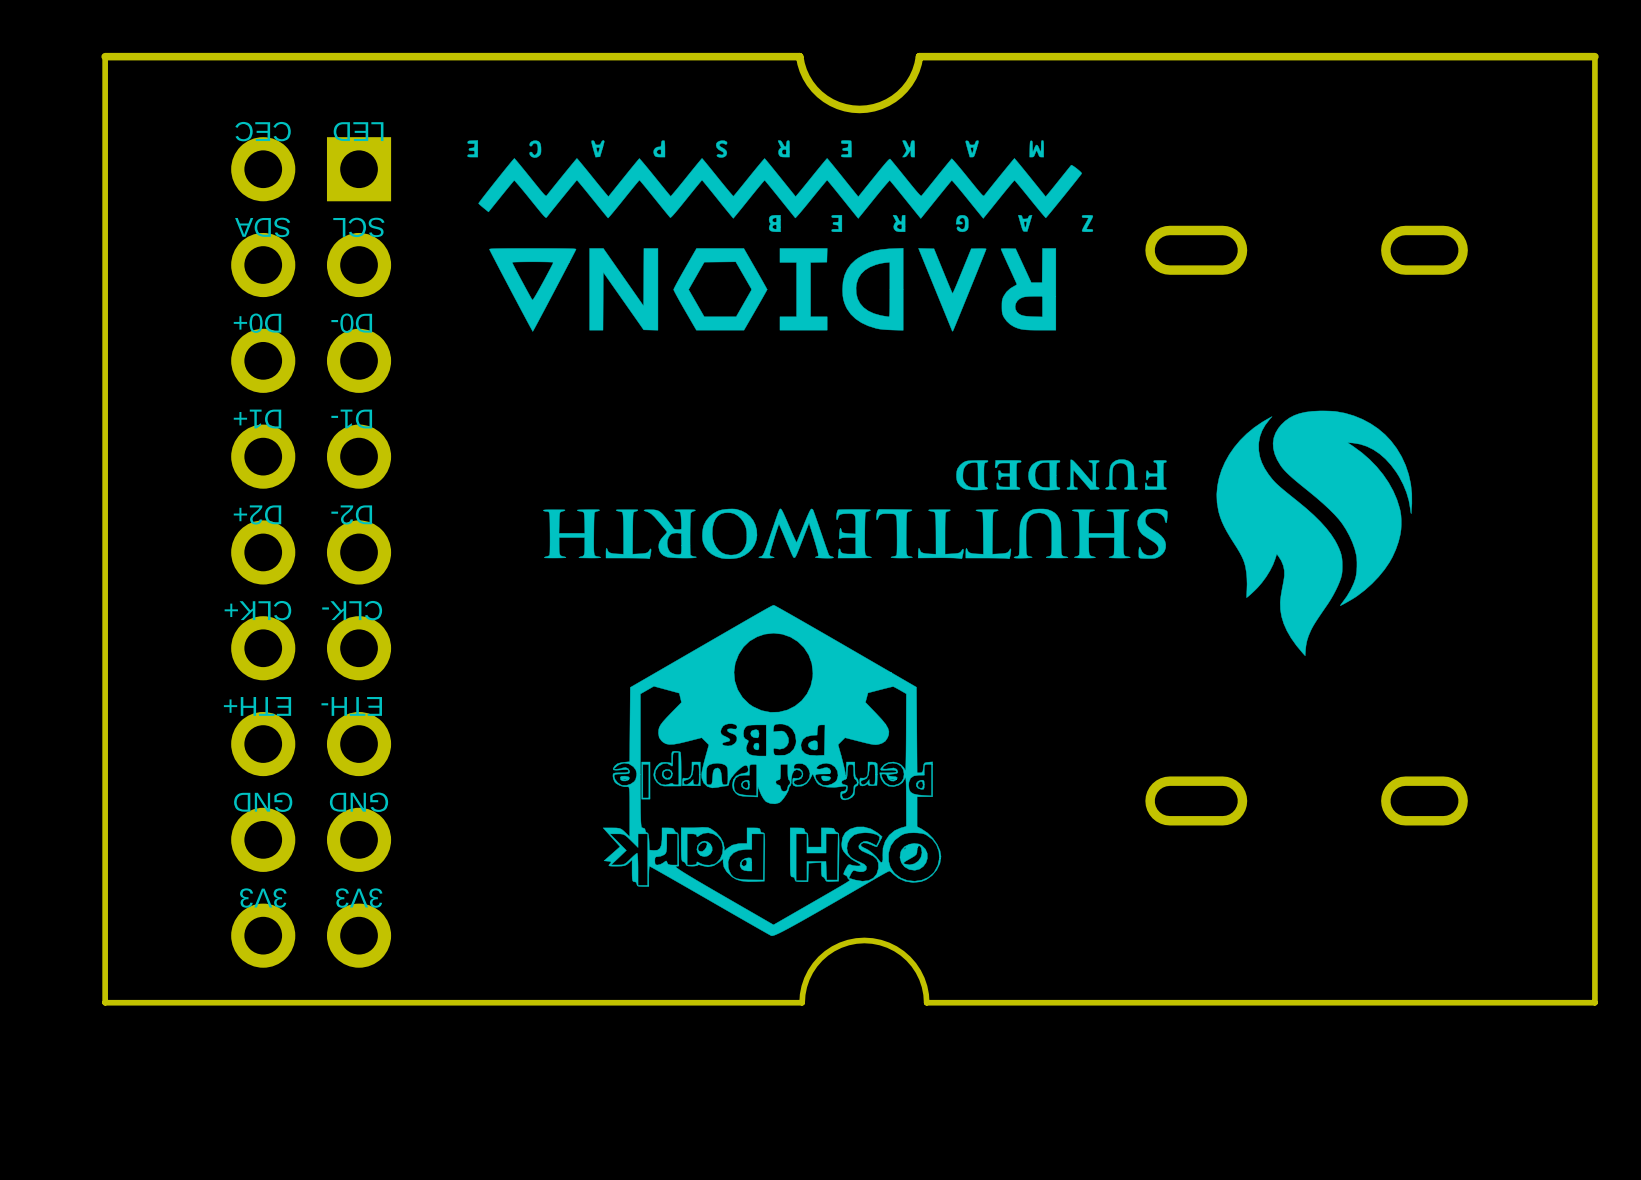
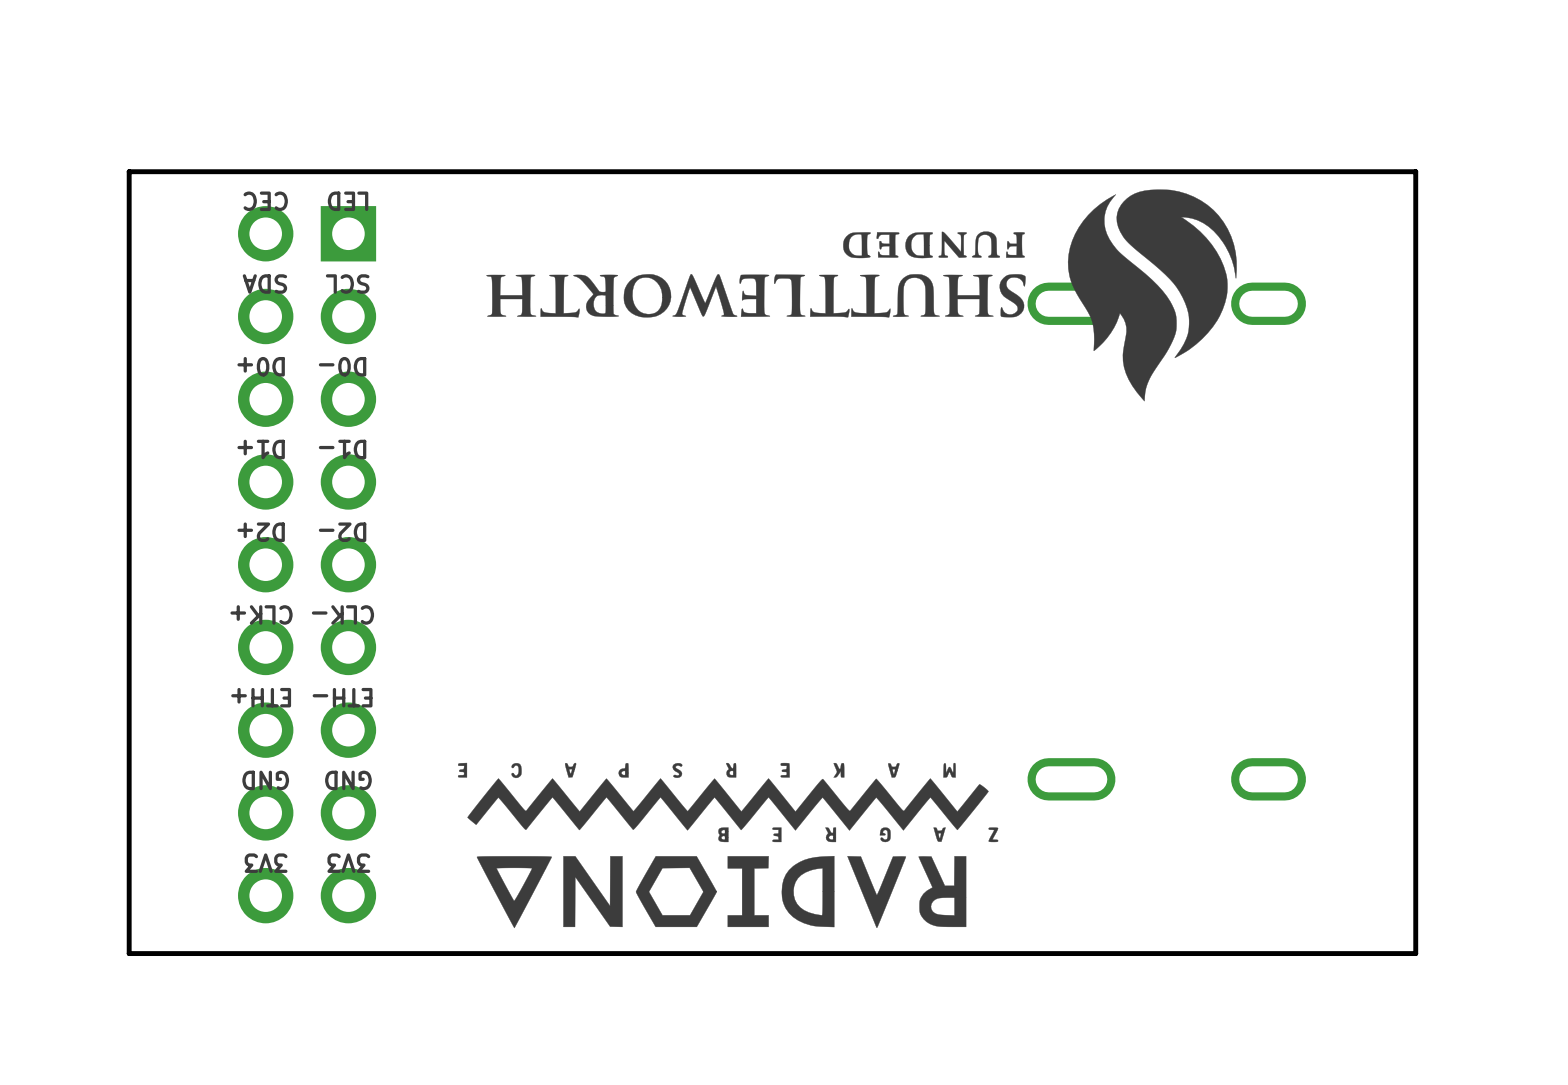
board edge: (1594, 97) (1594, 56) (919, 56) (912, 77) (899, 94) (880, 105) (859, 109) (838, 105) (819, 94) (806, 77) (799, 56) (105, 56) (105, 97) -> (1415, 171) (129, 171)
drawing position: (780, 235) -> (728, 845)
drawing position: (977, 533) -> (861, 295)
drawing: [602, 605, 942, 937] -> none
board edge: (926, 1002) (921, 978) (908, 958) (888, 945) (864, 940) (840, 945) (820, 958) (806, 978) (802, 1002) -> (838, 953) (731, 953)

